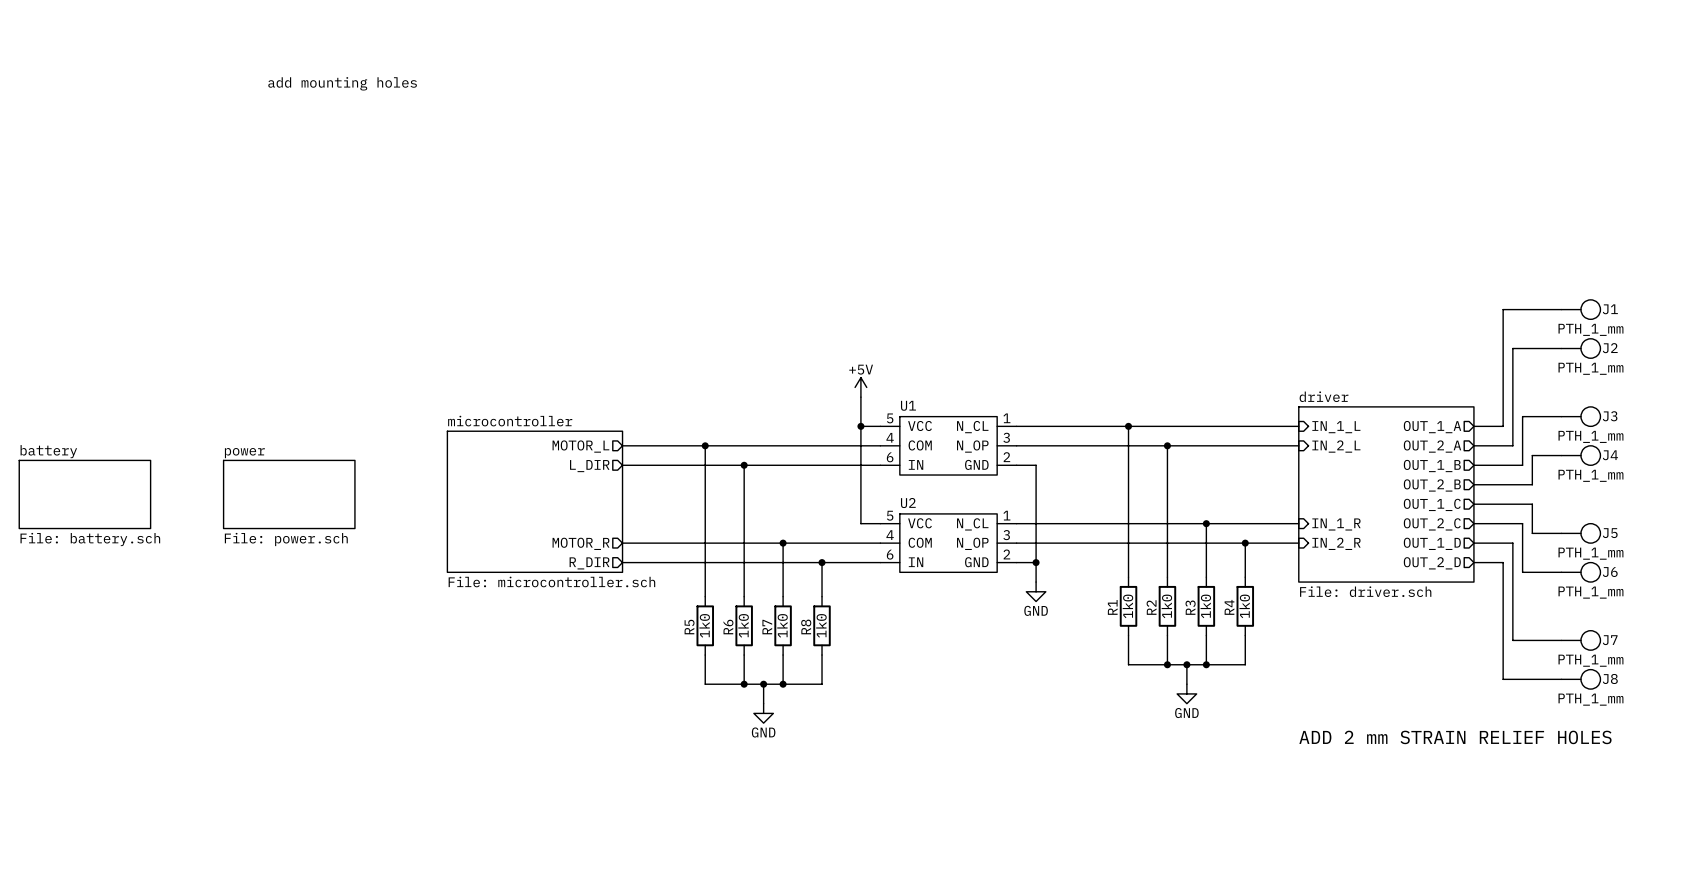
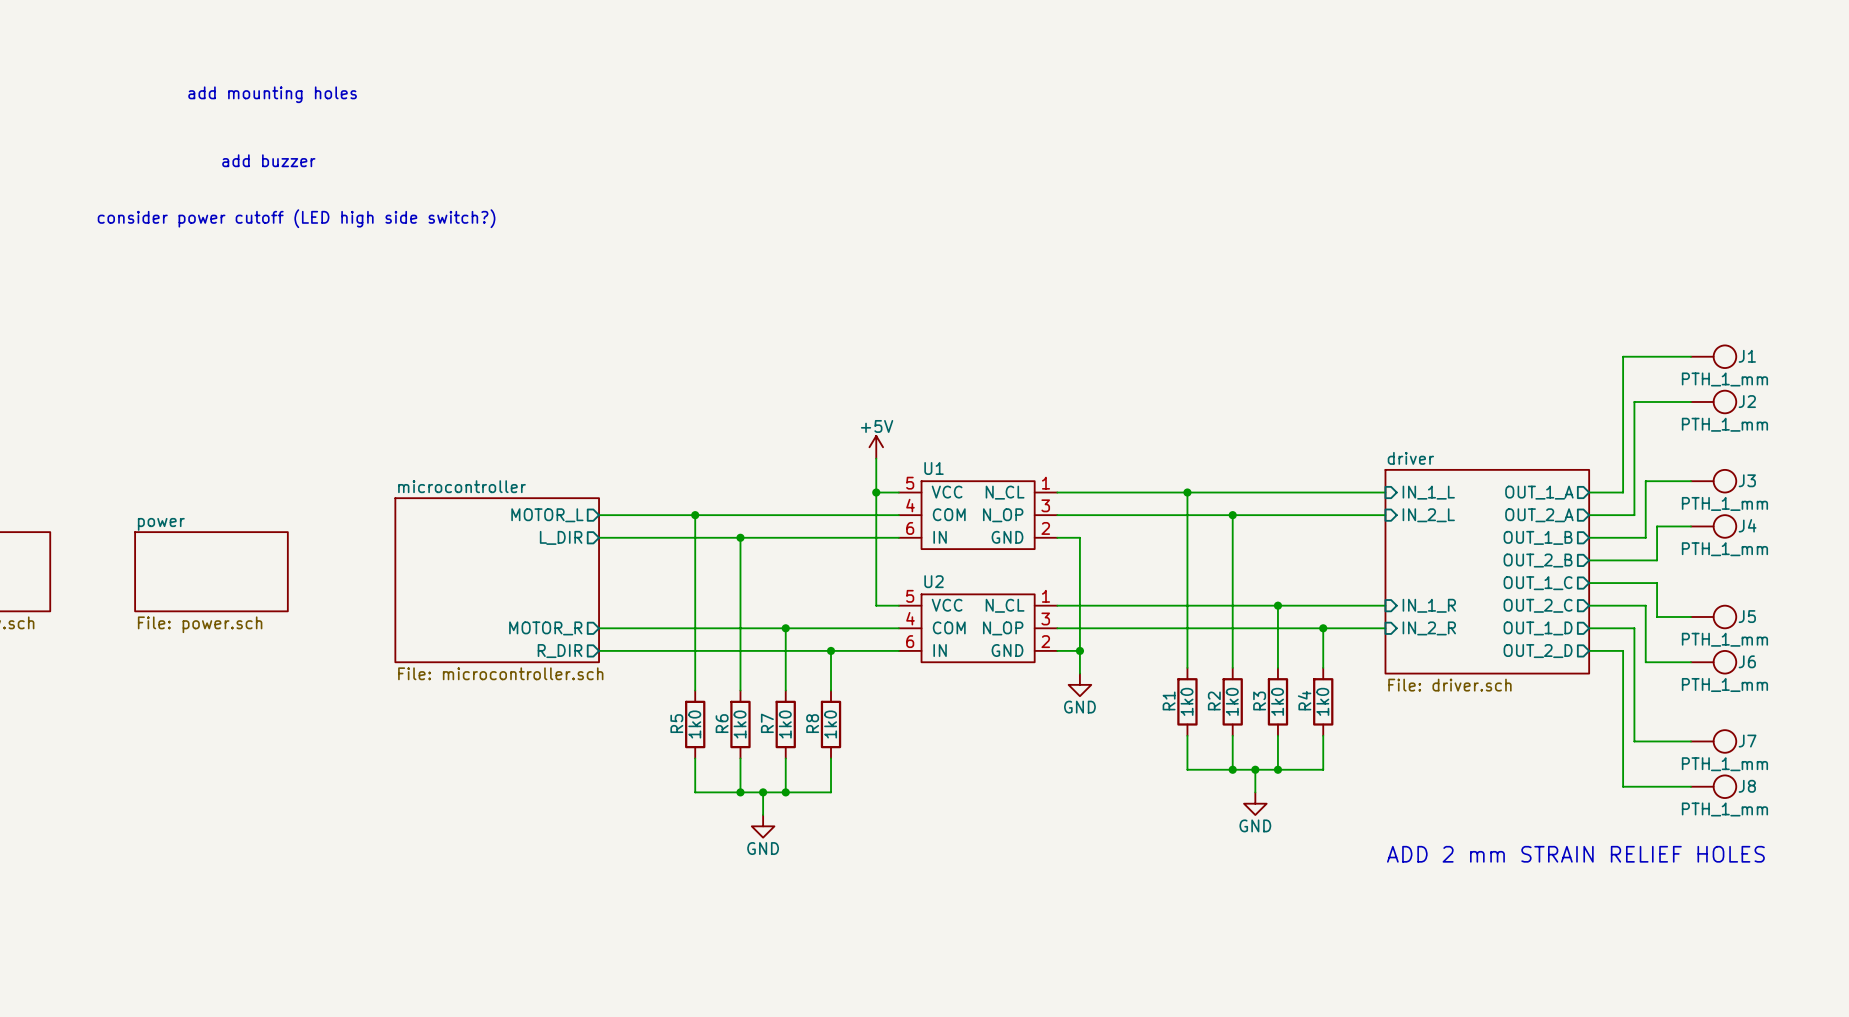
text: none -> add buzzer (268, 160)
text: none -> consider power cutoff (LED high side switch?) (296, 218)

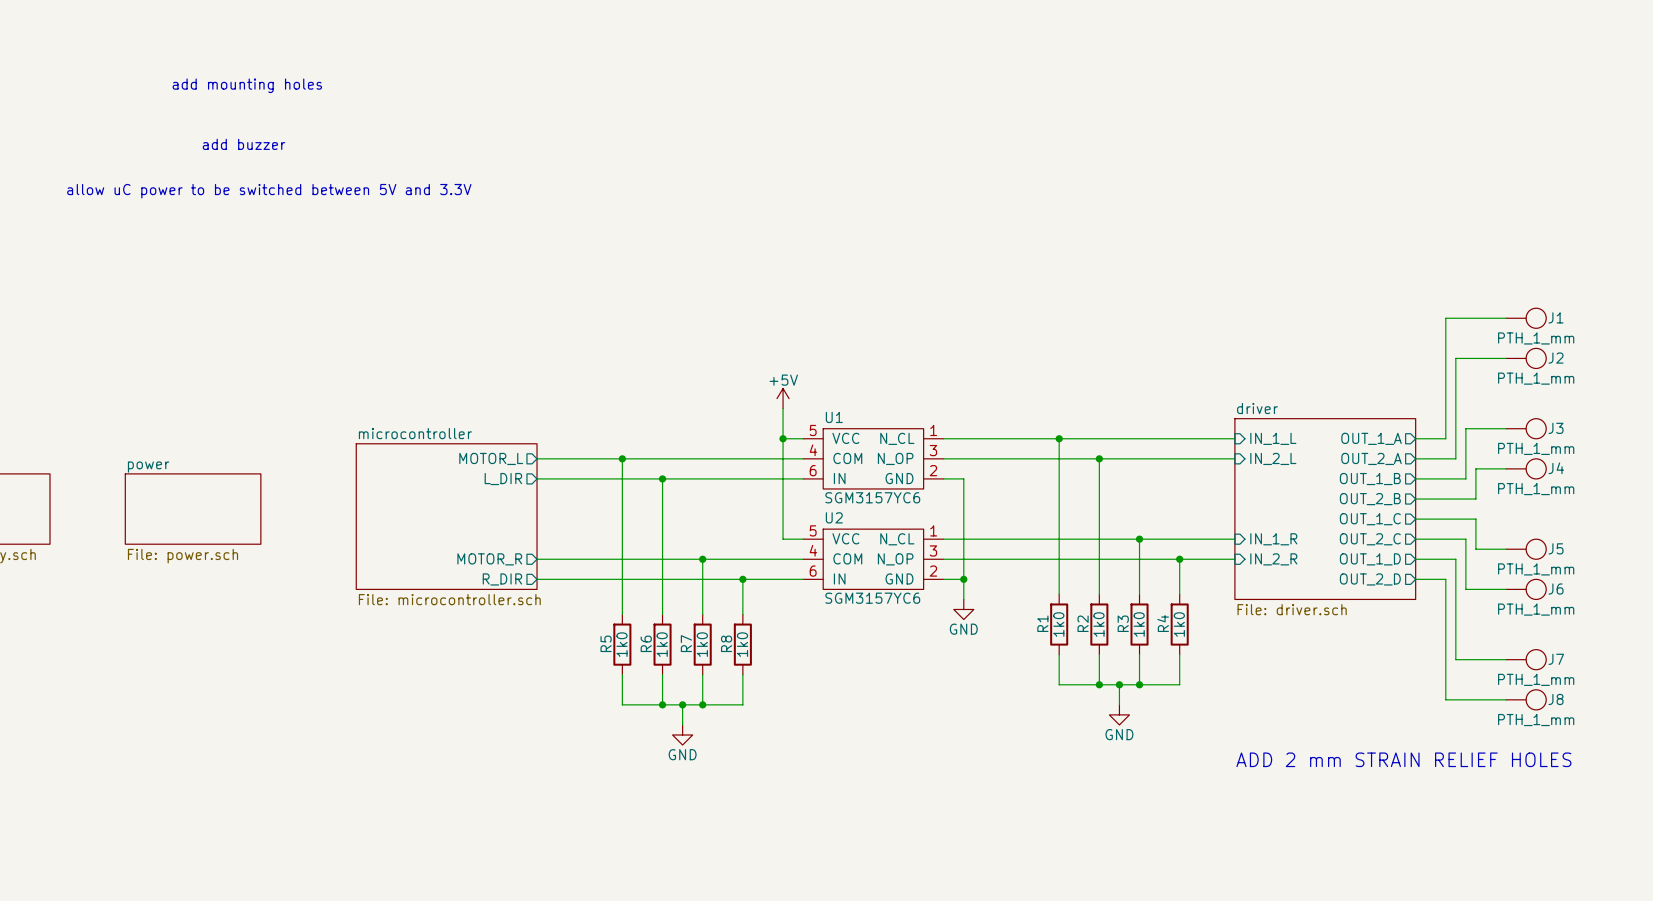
text: none -> allow uC power to be switched between 5V and 3.3V (269, 191)
text: consider power cutoff (LED high side switch?) (296, 218) -> none
U1 value: none -> SGM3157YC6 (872, 497)
U2 value: none -> SGM3157YC6 (872, 598)

